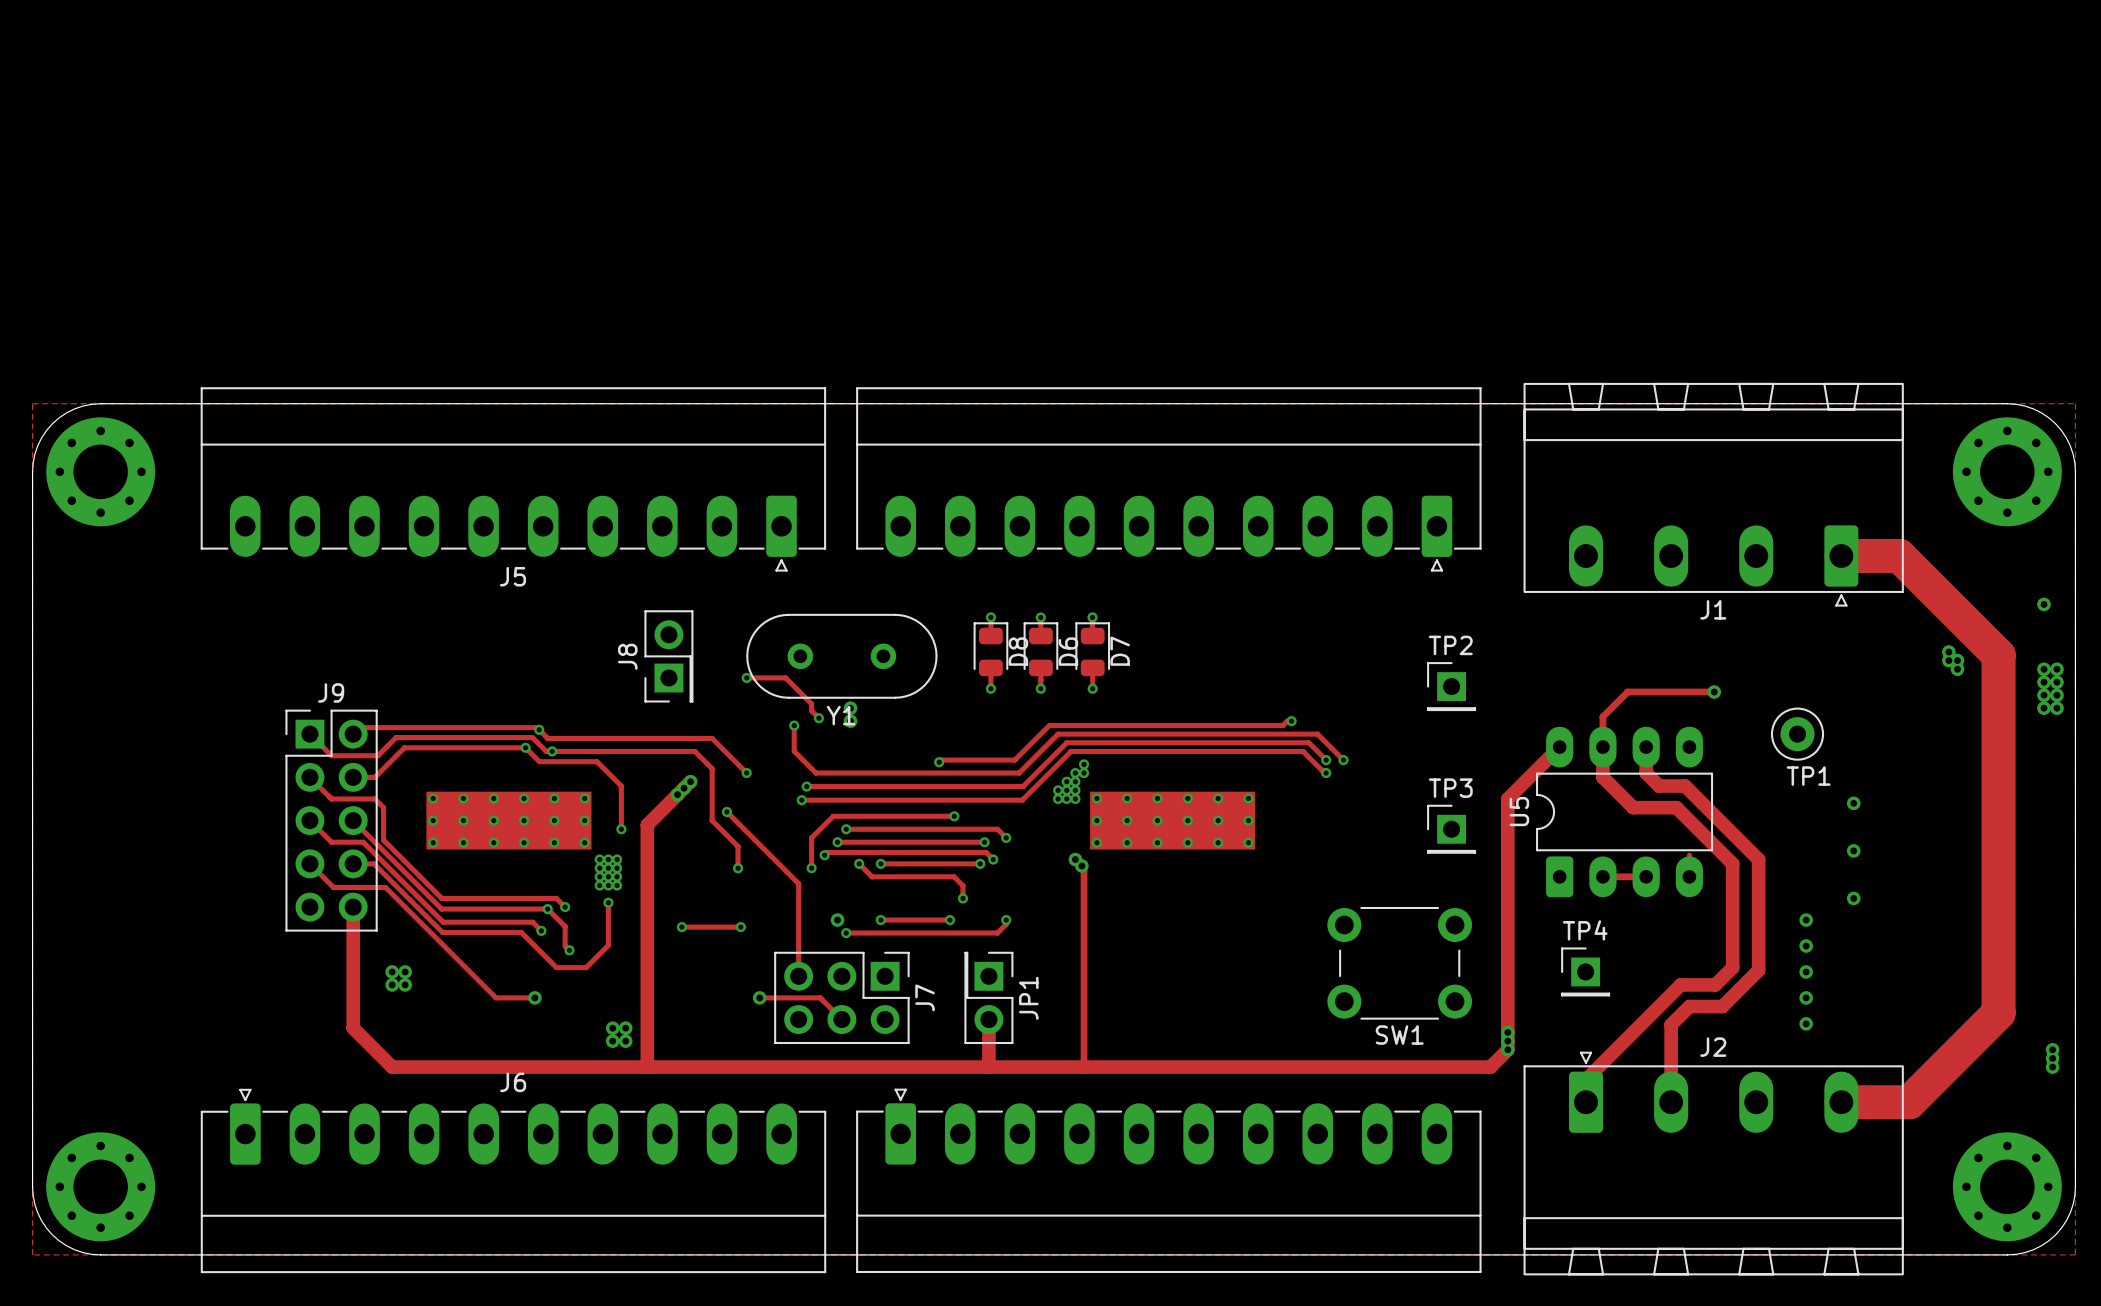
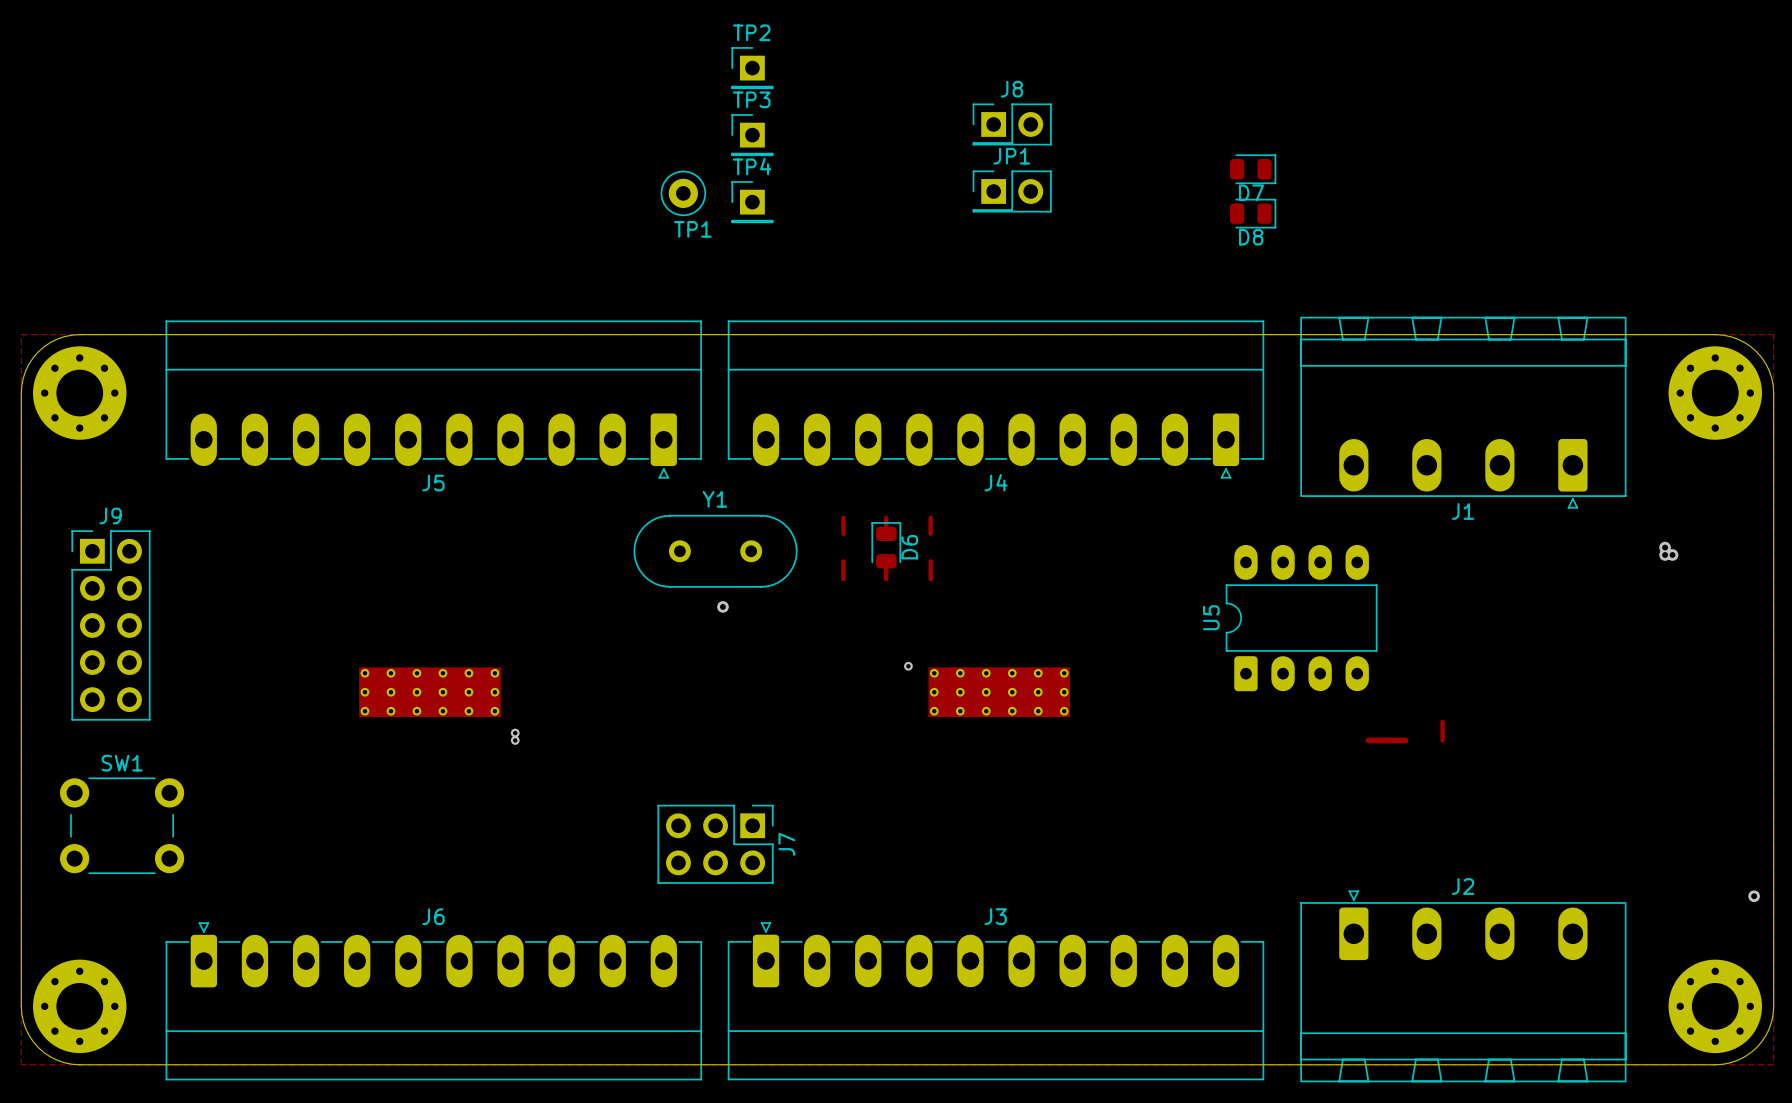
track: (1841, 556) (1899, 556) (1998, 655) (1998, 1013) (1909, 1102) (1841, 1102) -> none
J4 name: none -> J4 (995, 482)
via: (2043, 604) -> none
via: (990, 617) -> none
via: (1040, 617) -> none
via: (1092, 617) -> none
D8 rotation: 0° (990, 649) -> 90° clockwise (1253, 213)
D8 position: (990, 649) -> (1253, 213)
D7 rotation: 0° (1092, 649) -> 90° clockwise (1253, 169)
D7 position: (1092, 649) -> (1253, 169)
J8 rotation: 0° (668, 656) -> 90° clockwise (1012, 124)
J8 position: (668, 656) -> (1012, 124)
Y1 rotation: 0° (841, 656) -> 180° (715, 551)
via: (1957, 669) -> none
via: (2043, 669) -> none
via: (2056, 669) -> none
track: (746, 677) (785, 677) (811, 703) (811, 710) (818, 718) -> none
via: (746, 677) -> none
via: (2043, 682) -> none
via: (2056, 682) -> none
TP2 position: (1451, 686) -> (752, 68)
via: (990, 688) -> none
via: (1040, 688) -> none
via: (1092, 688) -> none
track: (1714, 692) (1627, 692) (1602, 716) (1602, 777) (1633, 807) (1676, 807) (1732, 863) (1732, 967) (1715, 984) (1680, 984) (1586, 1079) (1586, 1102) -> none
via: (1714, 692) -> none
via: (2043, 695) -> none
via: (2056, 695) -> none
via: (850, 708) -> none
via: (2043, 708) -> none
via: (2056, 708) -> none
via: (818, 718) -> none
track: (1291, 721) (1287, 721) (1282, 725) (1049, 725) (1014, 760) (941, 760) (939, 762) -> none
via: (1291, 721) -> none
track: (794, 725) (794, 751) (815, 773) (1019, 773) (1058, 734) (1317, 734) (1343, 760) -> none
via: (794, 725) -> none
via: (539, 729) -> none
track: (309, 734) (331, 755) (377, 755) (396, 737) (532, 737) (546, 751) (694, 751) (712, 768) (712, 820) (738, 846) (738, 868) -> none
track: (353, 734) (359, 727) (537, 727) (547, 738) (712, 738) (746, 772) -> none
TP1 position: (1797, 734) -> (683, 193)
via: (525, 747) -> none
track: (1559, 747) (1507, 798) (1507, 1049) (1490, 1067) (392, 1067) (353, 1028) (353, 907) -> none
track: (1646, 747) (1646, 773) (1659, 786) (1685, 786) (1758, 859) (1758, 970) (1722, 1006) (1689, 1006) (1671, 1024) (1671, 1102) -> none
via: (552, 751) -> none
track: (1326, 760) (1308, 742) (1066, 742) (1022, 786) (806, 786) -> none
via: (1326, 760) -> none
via: (1343, 760) -> none
via: (939, 762) -> none
via: (1084, 764) -> none
via: (746, 772) -> none
via: (1075, 773) -> none
via: (1084, 773) -> none
track: (1326, 773) (1303, 751) (1071, 751) (1022, 800) (801, 800) -> none
via: (1326, 773) -> none
track: (309, 777) (331, 799) -> none
track: (353, 777) (374, 777) (404, 747) (525, 747) (539, 761) (597, 761) (621, 786) (621, 829) -> none
track: (690, 781) (647, 824) (647, 1067) -> none
via: (690, 781) -> none
via: (1066, 781) -> none
via: (1075, 781) -> none
via: (806, 786) -> none
via: (684, 788) -> none
via: (1058, 790) -> none
via: (1075, 790) -> none
via: (677, 794) -> none
track: (331, 798) (374, 798) (383, 807) (383, 840) (441, 898) (556, 898) (565, 907) -> none
via: (1058, 798) -> none
via: (1066, 798) -> none
via: (1075, 798) -> none
via: (801, 800) -> none
via: (1853, 803) -> none
track: (726, 811) (798, 883) (798, 976) -> none
via: (726, 811) -> none
U5 position: (1624, 811) -> (1301, 618)
track: (954, 816) (833, 816) (811, 837) (811, 868) -> none
via: (954, 816) -> none
track: (309, 820) (331, 842) (363, 842) (443, 922) (532, 922) (541, 930) -> none
J9 position: (331, 820) -> (110, 625)
track: (353, 820) (441, 909) (547, 909) (565, 926) (565, 946) (569, 950) -> none
via: (621, 829) -> none
track: (846, 829) (997, 829) (1006, 837) -> none
via: (846, 829) -> none
TP3 position: (1451, 829) -> (752, 135)
via: (1006, 837) -> none
track: (837, 842) (984, 842) -> none
via: (837, 842) -> none
via: (984, 842) -> none
via: (1853, 850) -> none
track: (824, 855) (827, 852) (986, 852) (993, 859) -> none
via: (824, 855) -> none
via: (599, 859) -> none
via: (608, 859) -> none
via: (617, 859) -> none
via: (993, 859) -> none
track: (1075, 859) (1084, 868) (1084, 1067) -> none
via: (1075, 859) -> none
track: (309, 863) (333, 887) (385, 887) (495, 997) (534, 997) -> none
track: (353, 863) (374, 863) (442, 932) (521, 932) (556, 967) (586, 967) (608, 945) (608, 902) -> none
track: (859, 863) (872, 876) (954, 876) (962, 885) (962, 898) -> none
via: (859, 863) -> none
track: (880, 863) (980, 863) -> none
via: (880, 863) -> none
via: (980, 863) -> none
via: (1081, 866) -> none
via: (599, 868) -> none
via: (617, 868) -> none
via: (738, 868) -> none
via: (811, 868) -> none
via: (599, 876) -> none
via: (617, 876) -> none
via: (599, 885) -> none
via: (608, 885) -> none
via: (617, 885) -> none
via: (962, 898) -> none
via: (1853, 898) -> none
via: (608, 902) -> none
via: (565, 907) -> none
via: (547, 909) -> none
via: (837, 920) -> none
track: (880, 920) (950, 920) -> none
via: (880, 920) -> none
via: (950, 920) -> none
track: (1006, 920) (1006, 924) (997, 933) (846, 933) -> none
via: (1006, 920) -> none
via: (1806, 920) -> none
track: (681, 927) (740, 927) -> none
via: (681, 927) -> none
via: (740, 927) -> none
via: (541, 930) -> none
via: (846, 933) -> none
via: (1806, 946) -> none
via: (569, 950) -> none
SW1 position: (1399, 963) -> (122, 825)
via: (392, 971) -> none
via: (405, 971) -> none
TP4 position: (1585, 971) -> (752, 202)
via: (1806, 971) -> none
via: (392, 984) -> none
via: (405, 984) -> none
via: (534, 997) -> none
track: (759, 997) (820, 997) (841, 1019) -> none
via: (759, 997) -> none
JP1 rotation: 0° (988, 997) -> 90° counterclockwise (1012, 191)
JP1 position: (988, 997) -> (1012, 191)
via: (1806, 997) -> none
track: (988, 1019) (988, 1067) -> none
via: (1806, 1023) -> none
via: (612, 1028) -> none
via: (625, 1028) -> none
via: (1507, 1032) -> none
SW1 name position: SW1 (1399, 1035) -> SW1 (122, 763)
via: (612, 1041) -> none
via: (625, 1041) -> none
via: (1507, 1041) -> none
via: (1507, 1049) -> none
via: (2052, 1049) -> none
via: (2052, 1067) -> none
J3 name: none -> J3 (995, 916)

